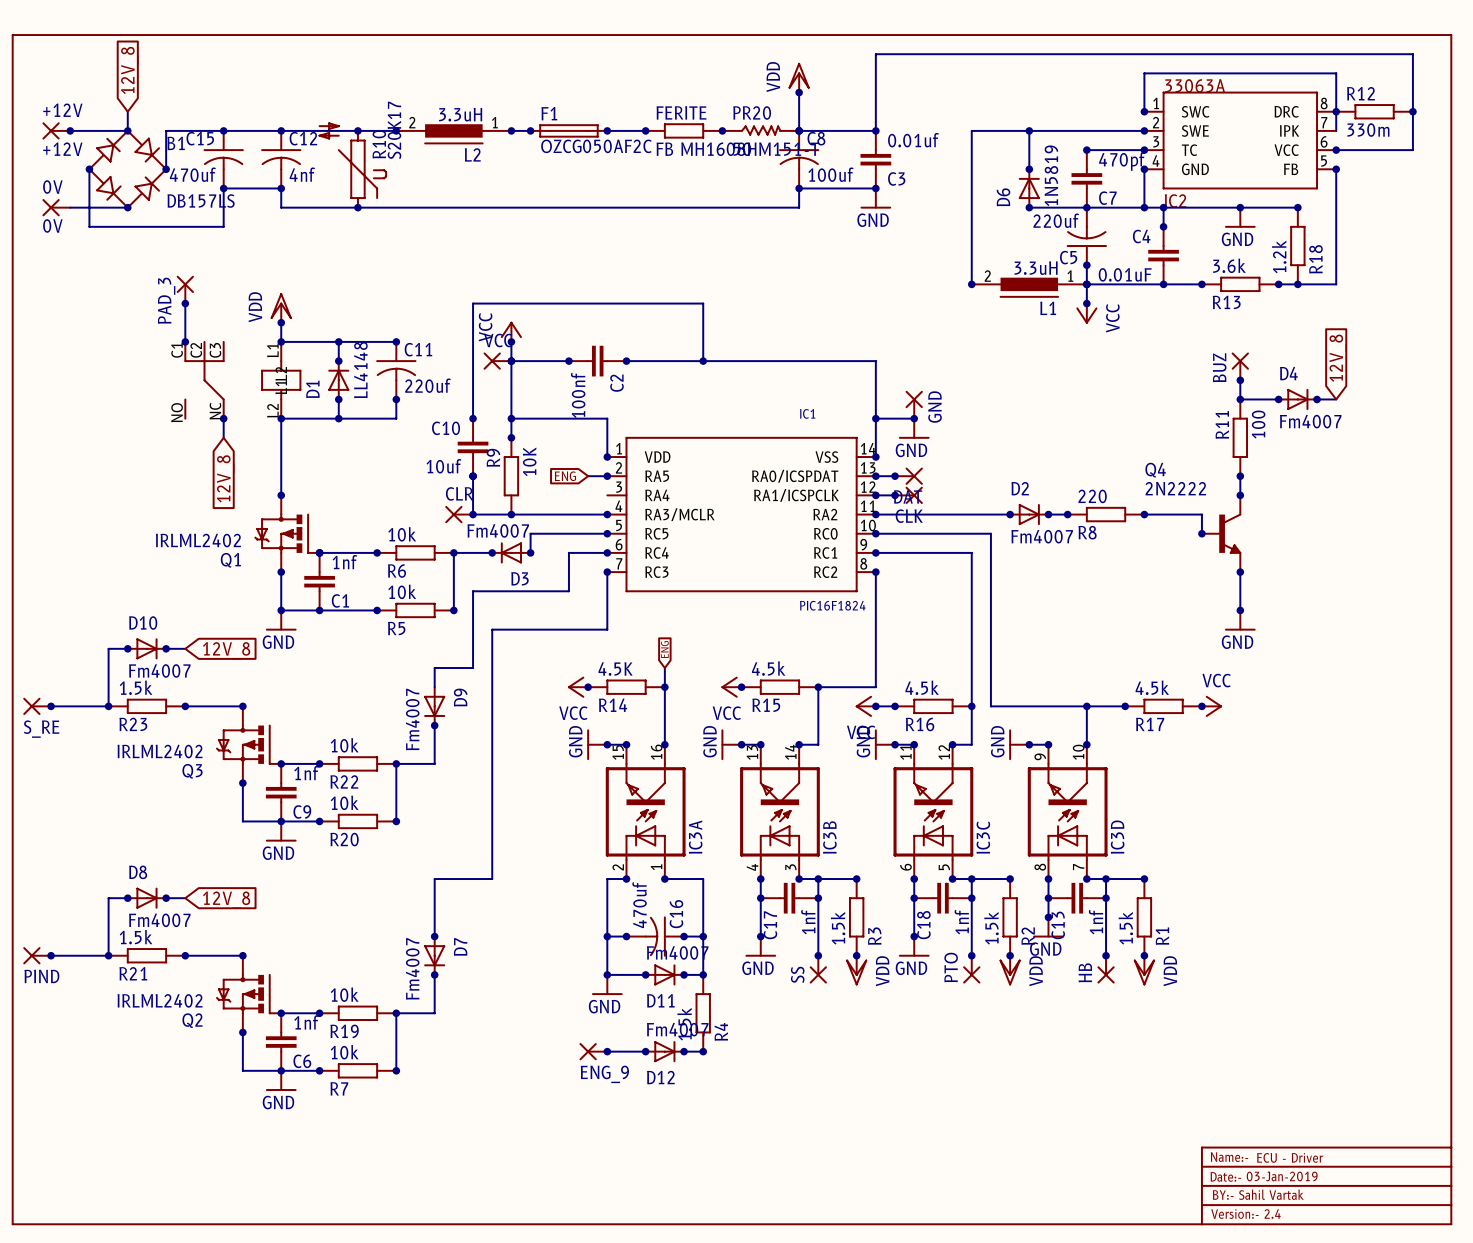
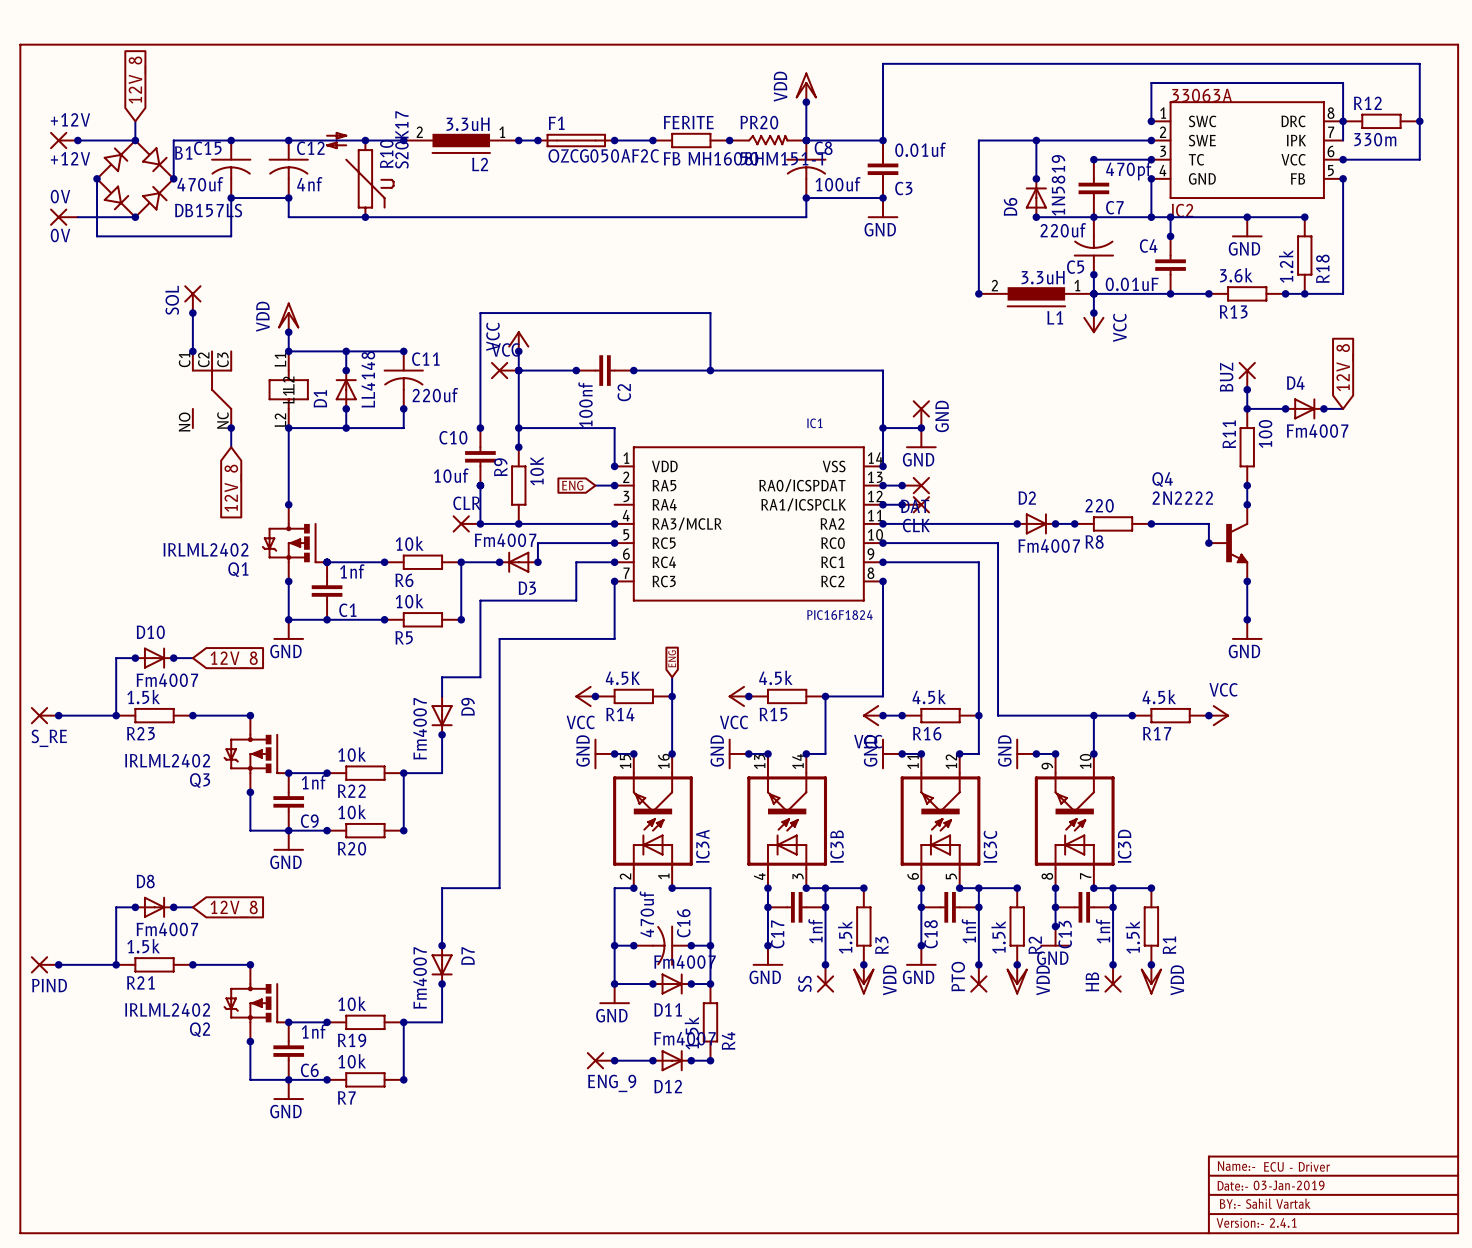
PAD_3 name: PAD_3 (166, 300) -> SOL (172, 300)
text: Version:- 2.4 (1246, 1214) -> Version:- 2.4.1 (1256, 1222)

